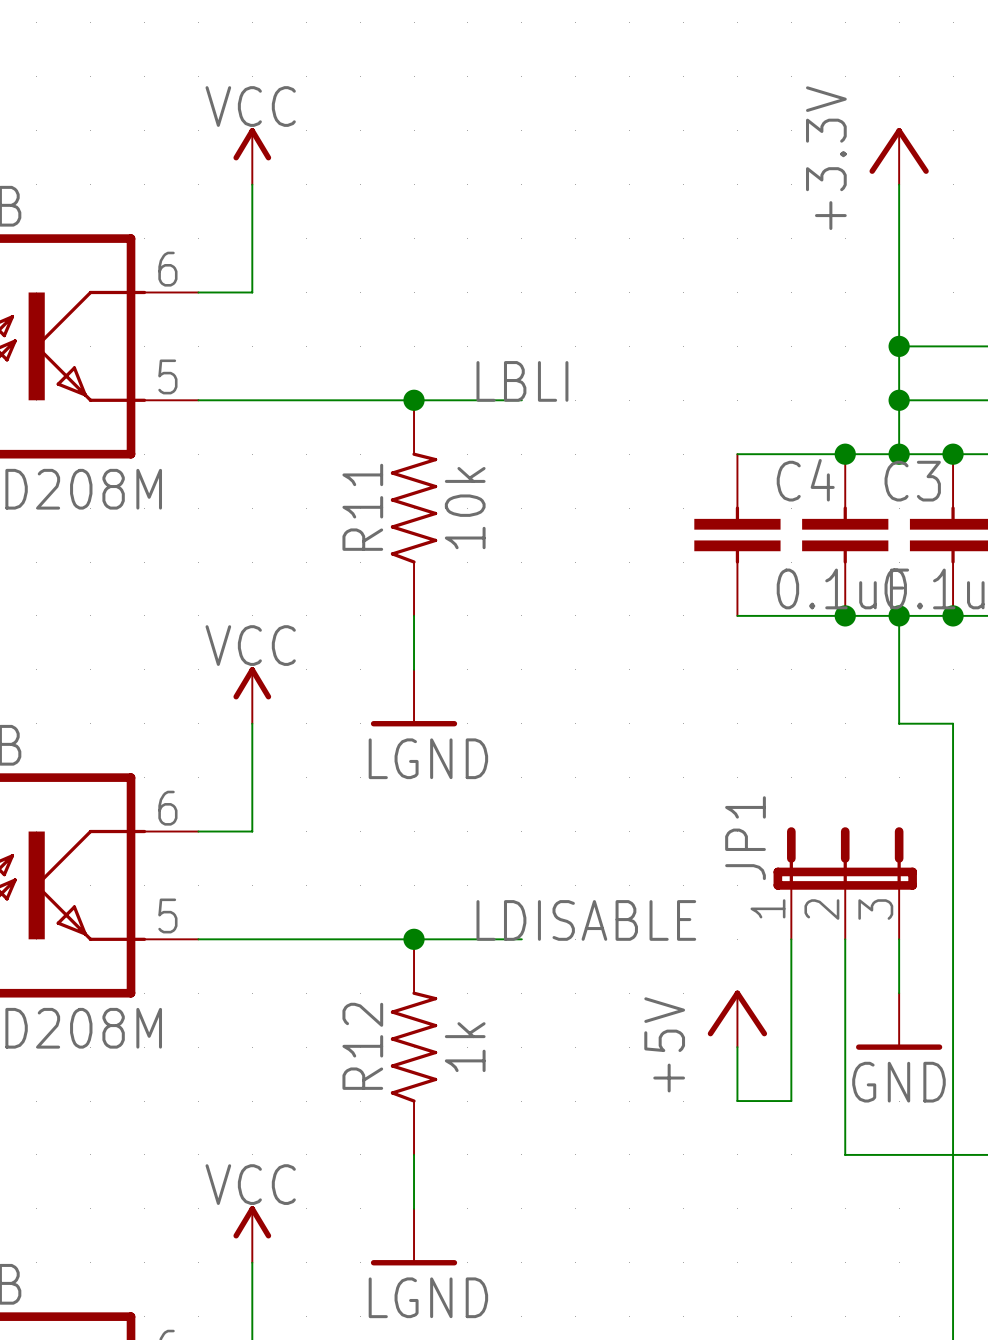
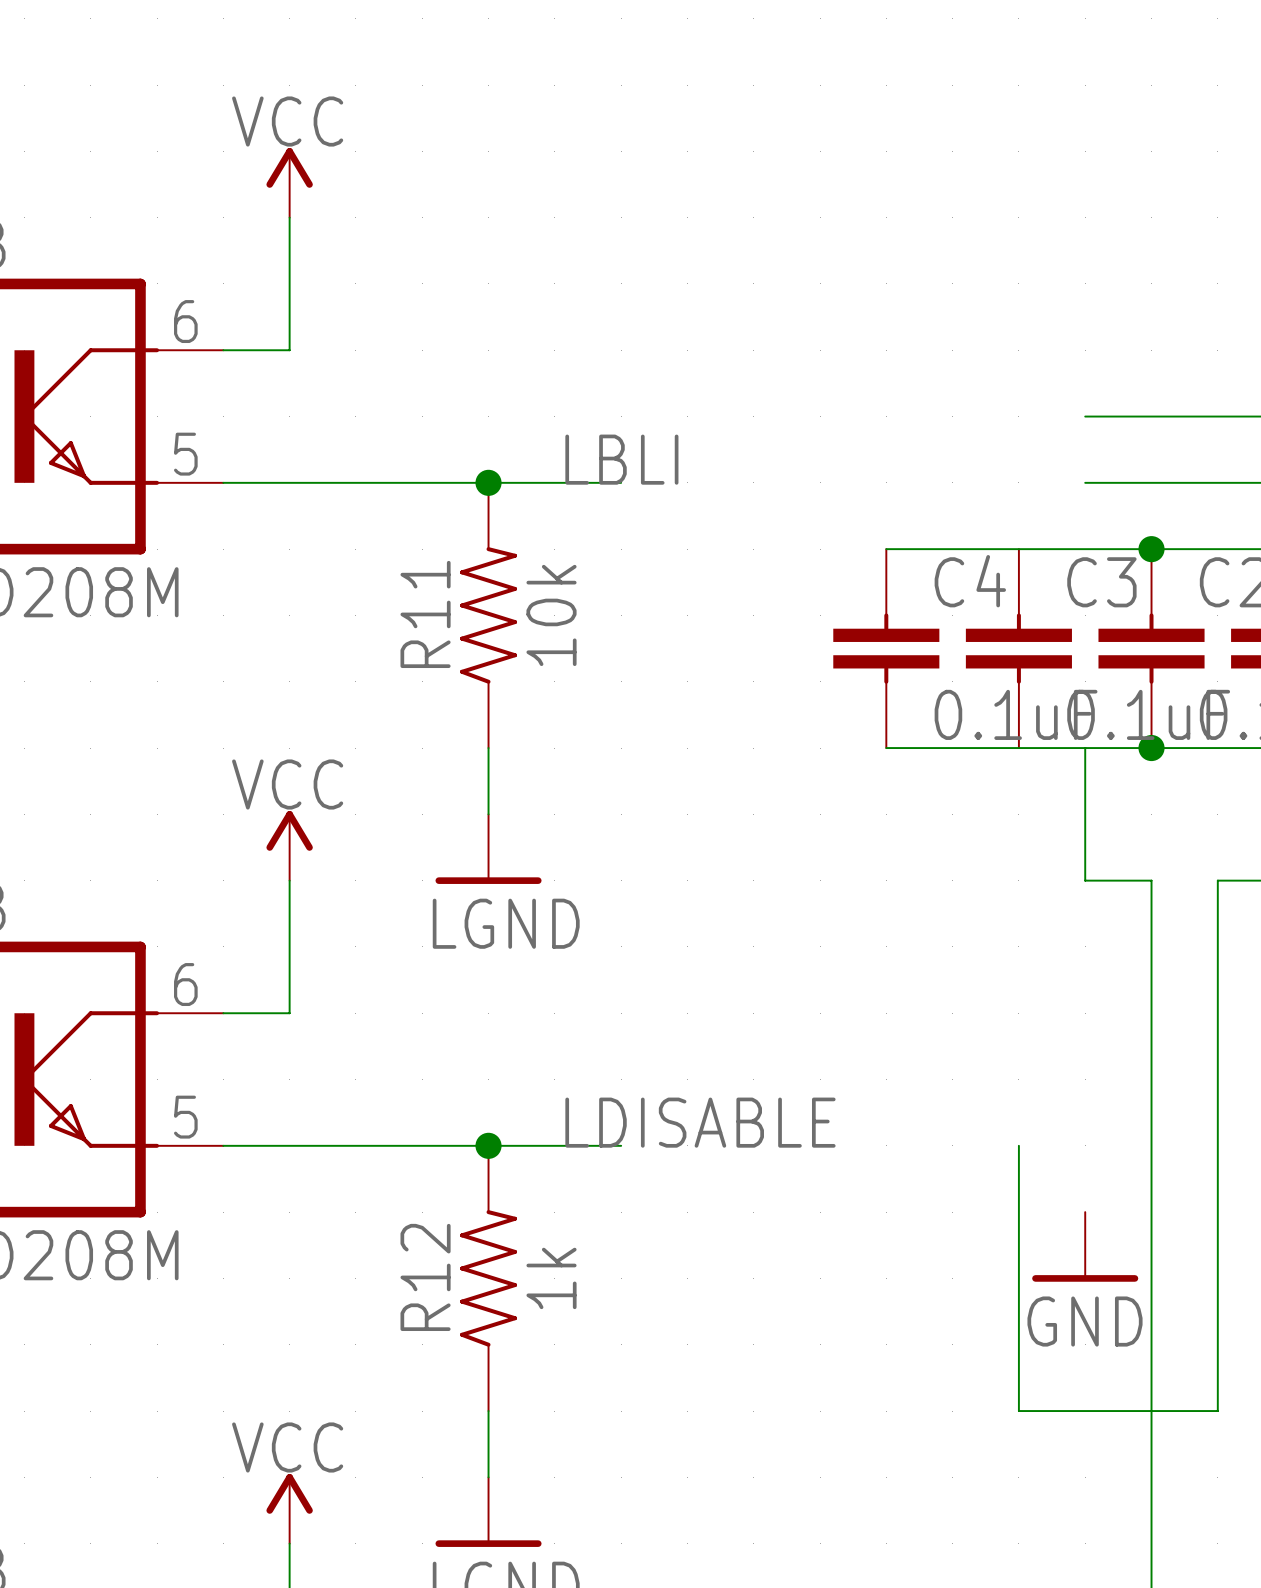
power symbol: +3.3V (899, 156) -> none
wire: (899, 184) (899, 454) -> none
junction: (899, 346) -> none
junction: (899, 400) -> none
junction: (845, 454) -> none
junction: (899, 454) -> none
junction: (845, 615) -> none
junction: (899, 615) -> none
JP1: (845, 883) -> none
wire: (791, 939) (791, 1101) (737, 1101) (737, 1047) -> none
wire: (899, 939) (899, 993) -> none
power symbol: +5V (737, 1018) -> none

